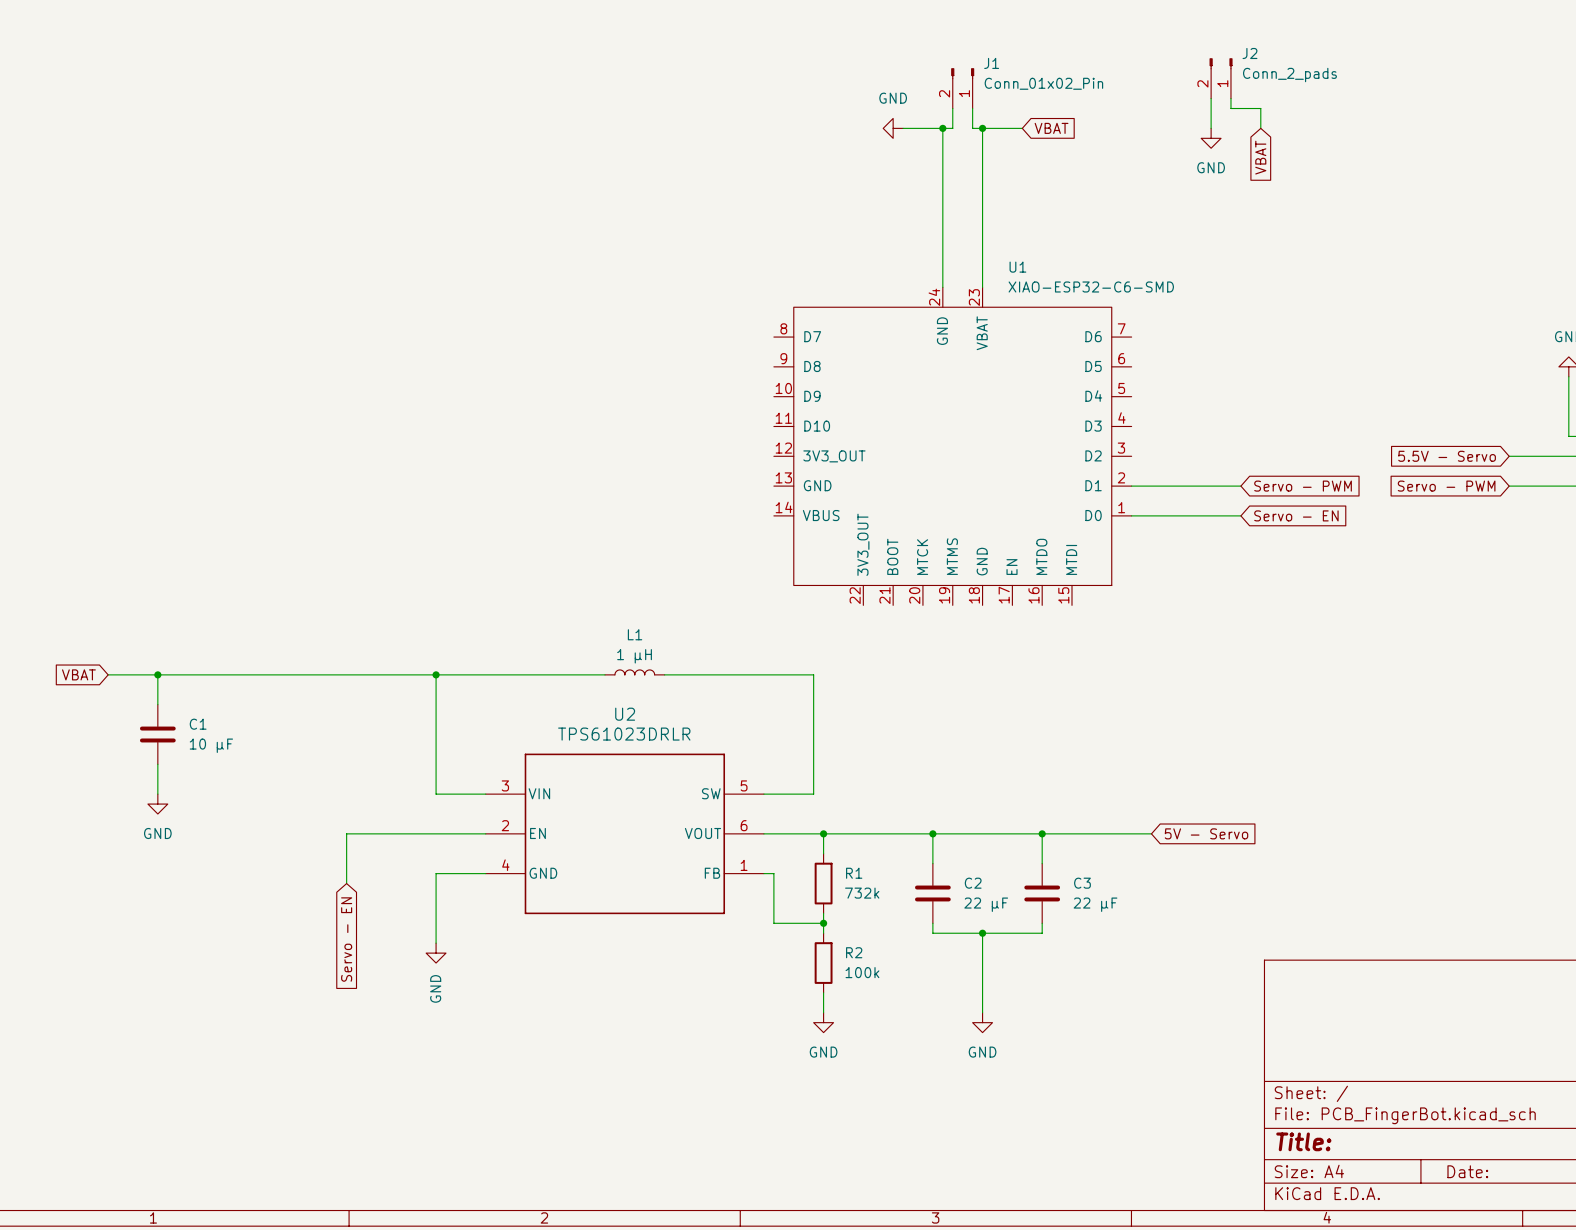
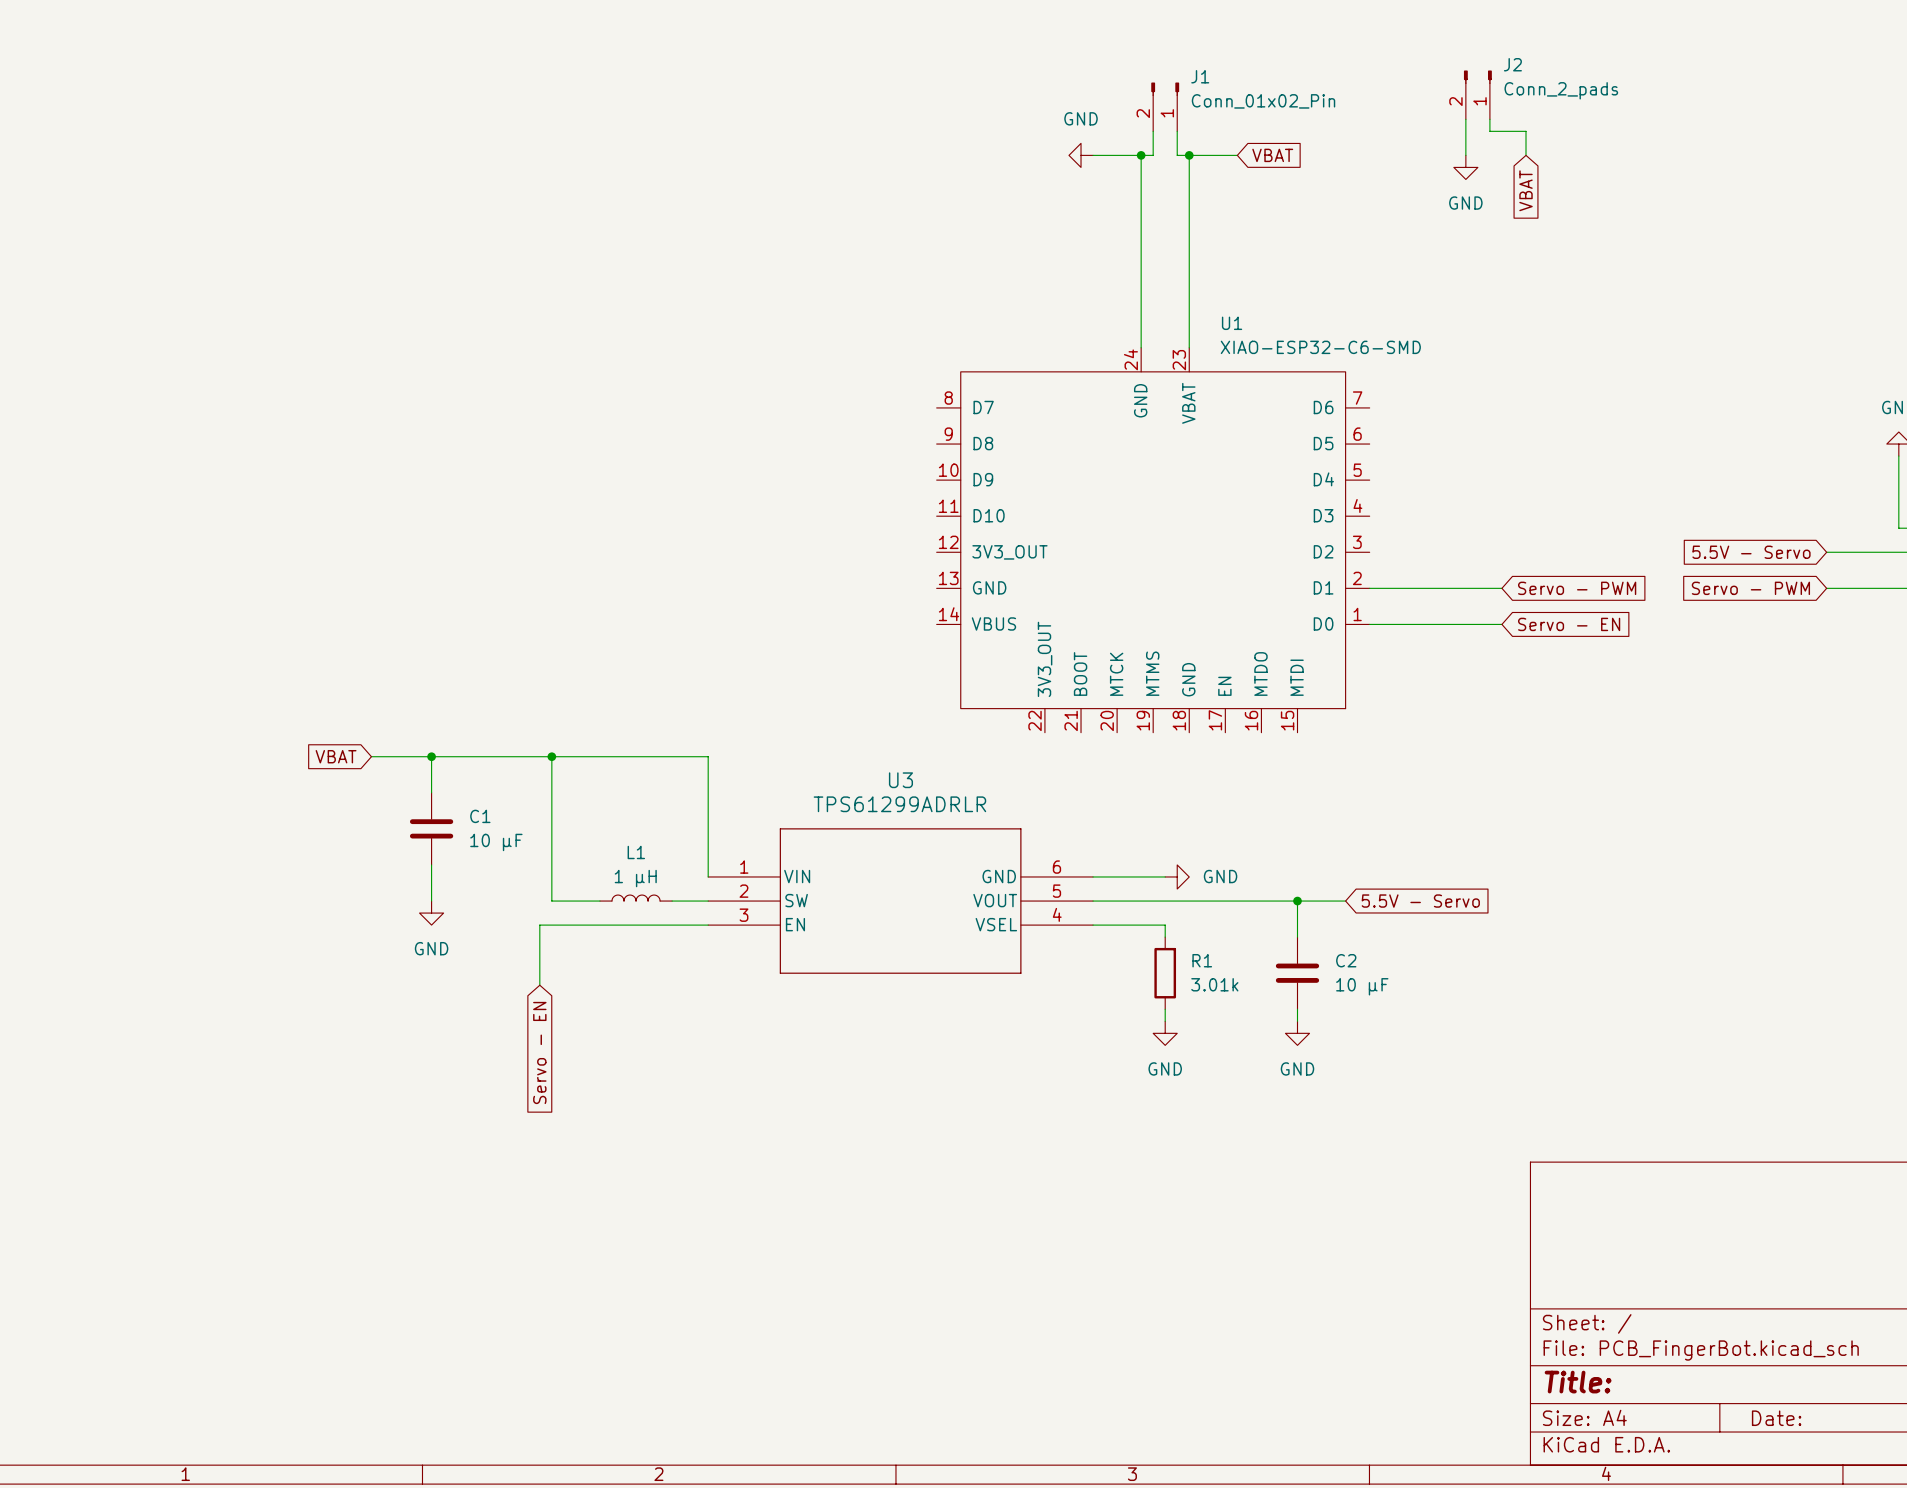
global label: none -> VBAT (336, 756)
wire: none -> (371, 756) (708, 756) (708, 876)
wire: none -> (431, 756) (431, 792)
junction: none -> (431, 756)
wire: none -> (551, 756) (551, 901) (599, 901)
junction: none -> (551, 756)
L1 position: (634, 672) -> (636, 898)
global label: VBAT (78, 674) -> none
wire: (108, 674) (604, 674) -> none
wire: (157, 674) (157, 704) -> none
junction: (157, 674) -> none
wire: (436, 674) (436, 794) (485, 794) -> none
junction: (436, 674) -> none
wire: (664, 674) (813, 674) (813, 794) (763, 794) -> none
wire: none -> (431, 864) (431, 901)
wire: none -> (1093, 876) (1165, 876)
power symbol: none -> GND (1177, 876)
C1 position: (157, 734) -> (431, 828)
wire: none -> (672, 901) (708, 901)
U3: none -> TPS61299ADRLR (900, 901)
wire: none -> (1093, 901) (1345, 901)
junction: none -> (1297, 901)
global label: none -> 5.5V - Servo (1420, 901)
power symbol: none -> GND (431, 913)
wire: (157, 764) (157, 794) -> none
wire: none -> (1093, 925) (1165, 925) (1165, 937)
power symbol: GND (157, 804) -> none
wire: (485, 833) (346, 833) (346, 883) -> (708, 925) (539, 925) (539, 985)
U2: TPS61023DRLR (624, 833) -> none
wire: (763, 833) (1151, 833) -> none
wire: (823, 833) (823, 853) -> none
junction: (823, 833) -> none
wire: (932, 833) (932, 863) -> none
junction: (932, 833) -> none
wire: none -> (1165, 1009) (1165, 1021)
wire: (1042, 833) (1042, 863) -> (1297, 901) (1297, 937)
junction: (1042, 833) -> none
wire: none -> (1297, 1009) (1297, 1021)
global label: 5V - Servo (1206, 833) -> none
power symbol: none -> GND (1165, 1033)
power symbol: none -> GND (1297, 1033)
wire: (485, 873) (436, 873) (436, 943) -> none
wire: (763, 873) (773, 873) (773, 923) (823, 923) -> none
R1 position: (823, 883) -> (1165, 973)
R1 value: 732k (862, 893) -> 3.01k (1214, 984)
C2 position: (932, 893) -> (1297, 973)
C3: 22 μF (1042, 893) -> none
C2 value: 22 μF (986, 904) -> 10 μF (1362, 986)
wire: (823, 913) (823, 933) -> none
junction: (823, 923) -> none
wire: (932, 923) (932, 933) (1042, 933) (1042, 923) -> none
wire: (982, 933) (982, 1012) -> none
junction: (982, 933) -> none
global label position: Servo - EN (346, 939) -> Servo - EN (539, 1052)
power symbol: GND (436, 953) -> none
R2: 100k (823, 963) -> none
wire: (823, 992) (823, 1012) -> none
power symbol: GND (823, 1022) -> none
power symbol: GND (982, 1022) -> none

